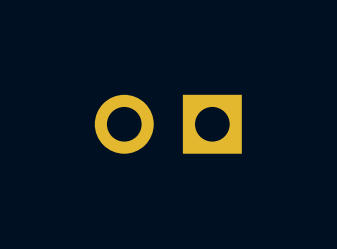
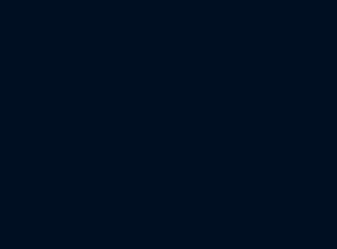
part: (168, 124) -> none

